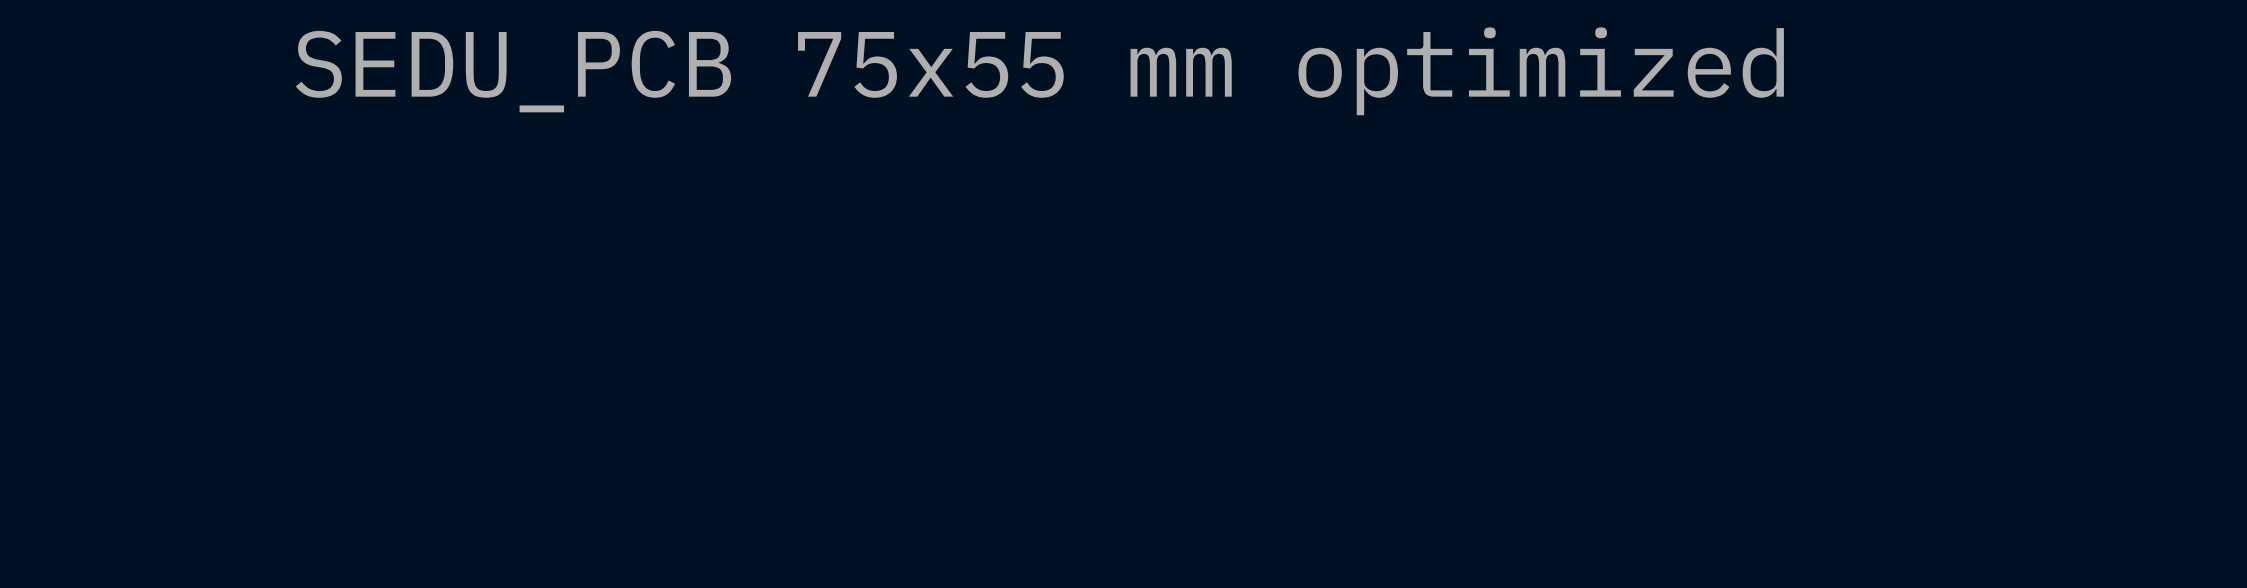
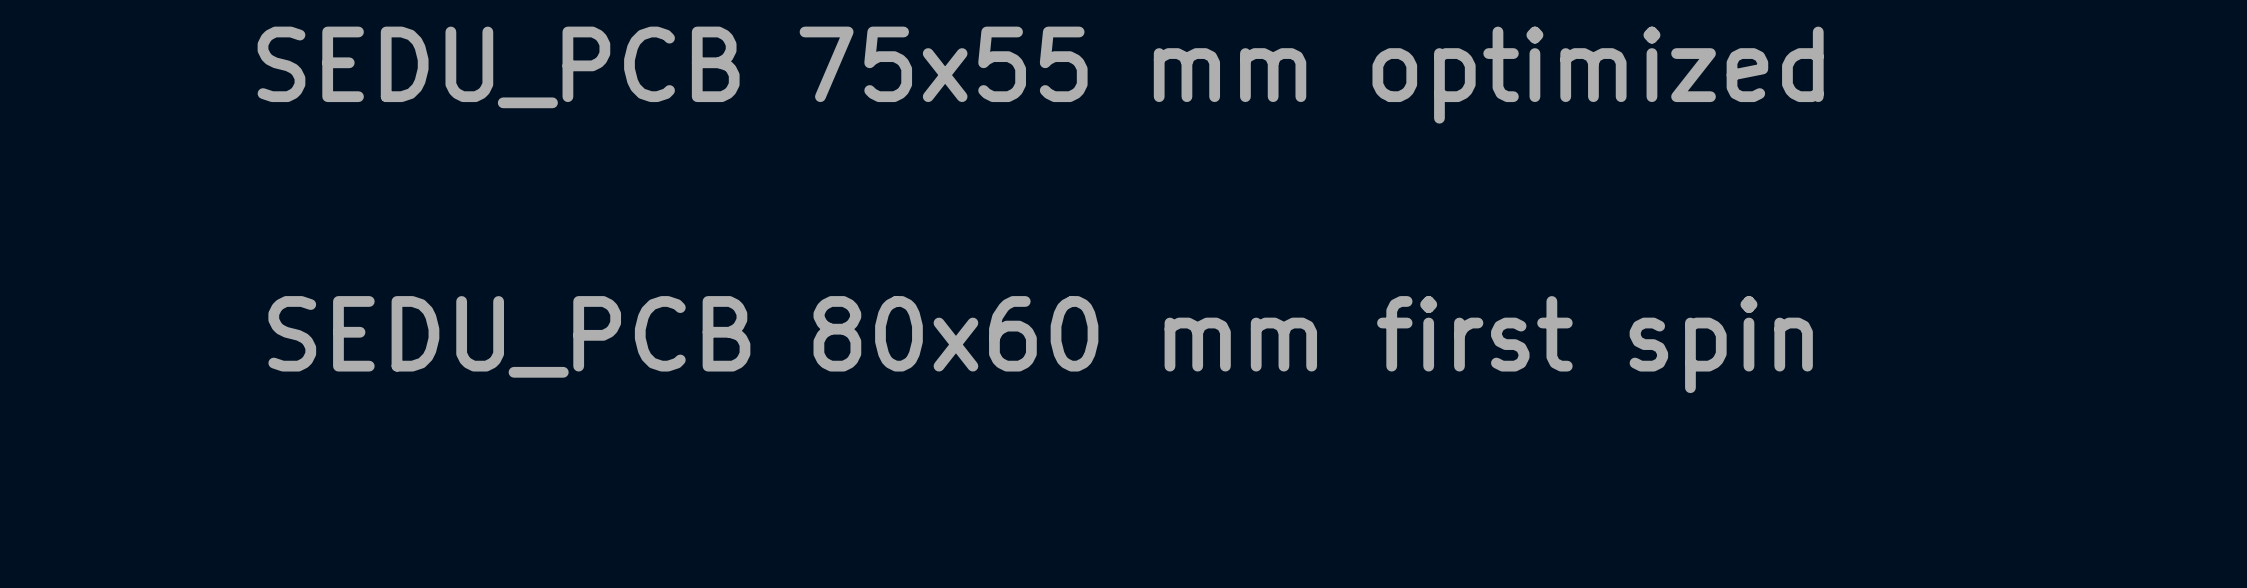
text: none -> SEDU_PCB 80x60 mm first spin (1040, 344)

